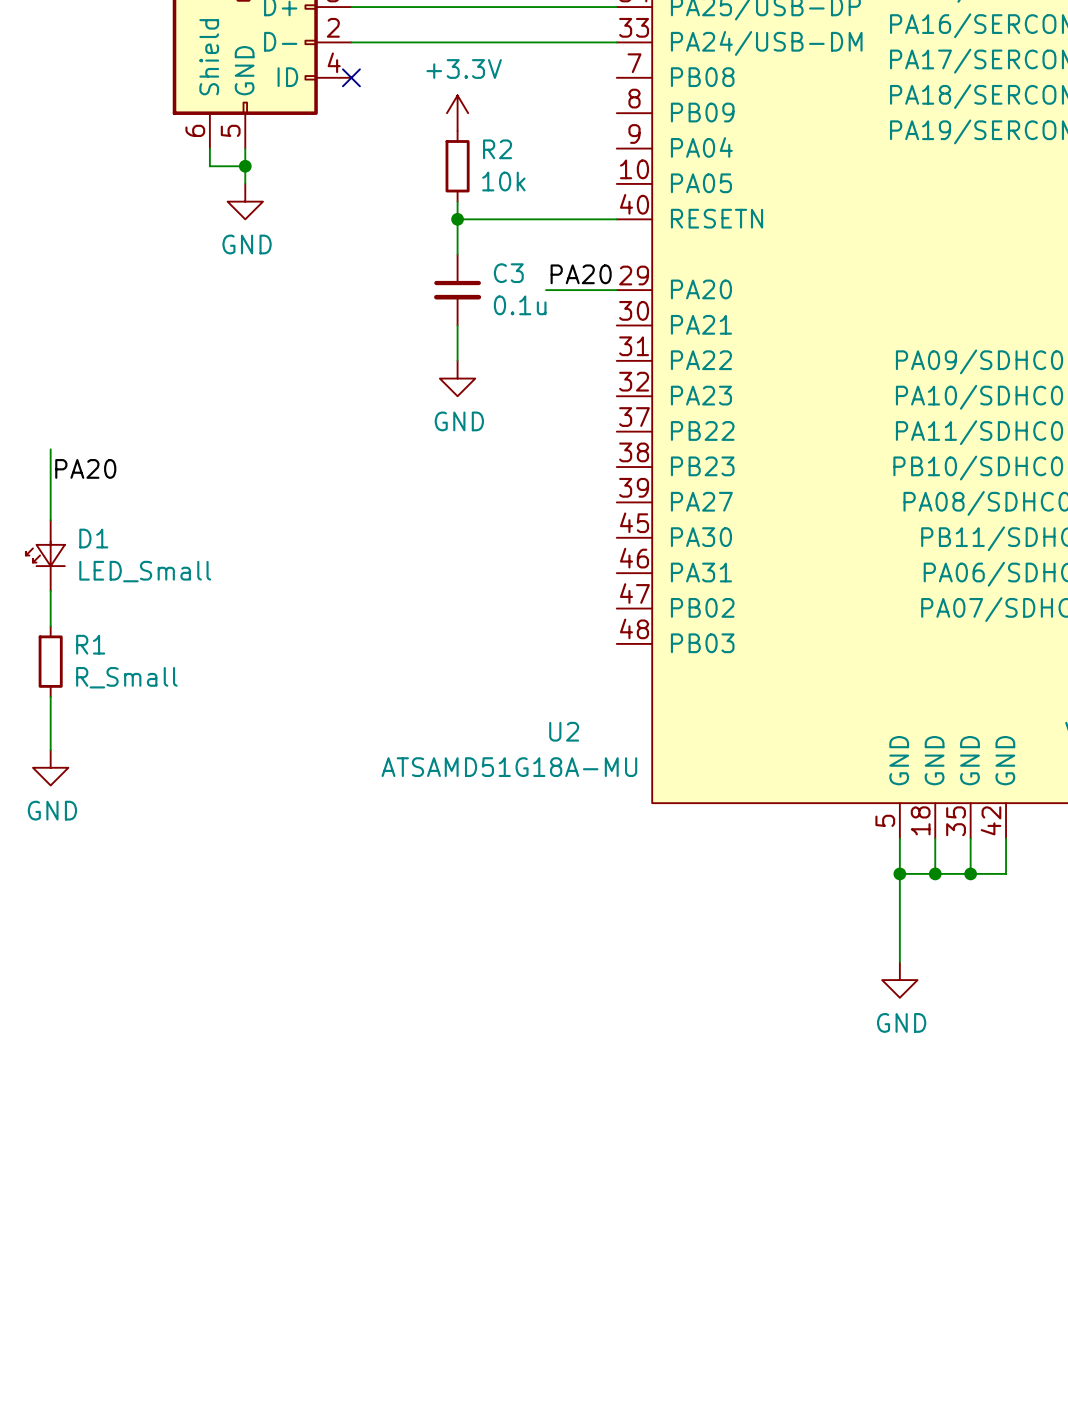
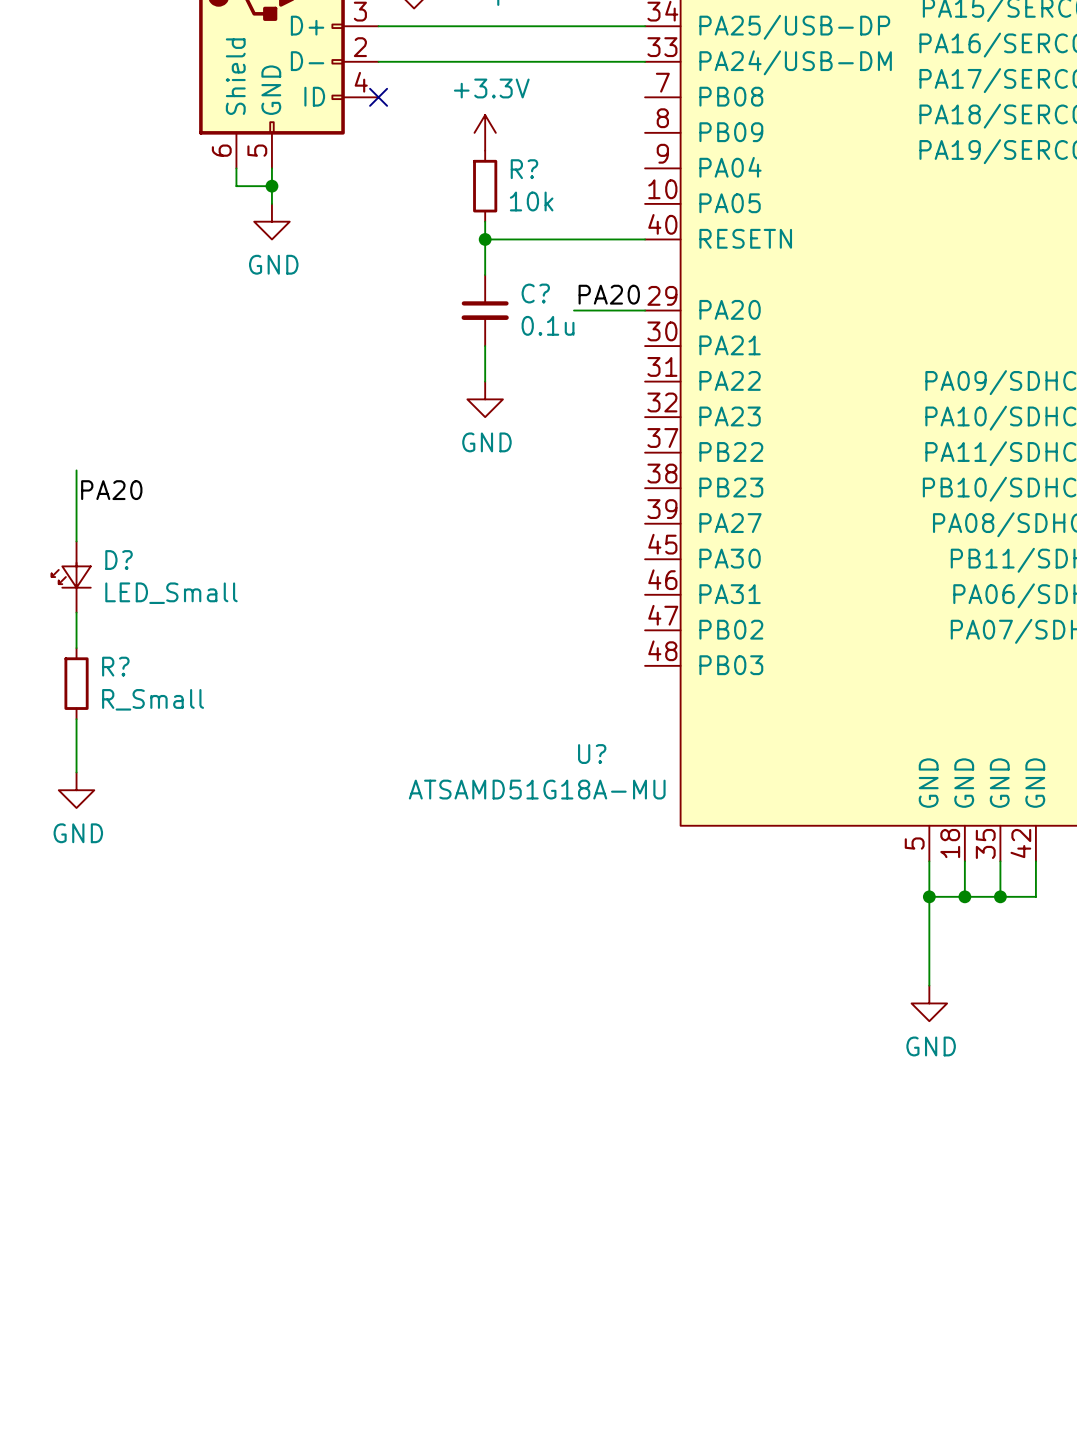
R2 name: R2 (497, 149) -> R? (524, 169)
C3 name: C3 (508, 273) -> C? (535, 293)
D1 name: D1 (93, 538) -> D? (119, 560)
R1 name: R1 (90, 644) -> R? (115, 666)
U2 name: U2 (564, 731) -> U? (592, 754)

